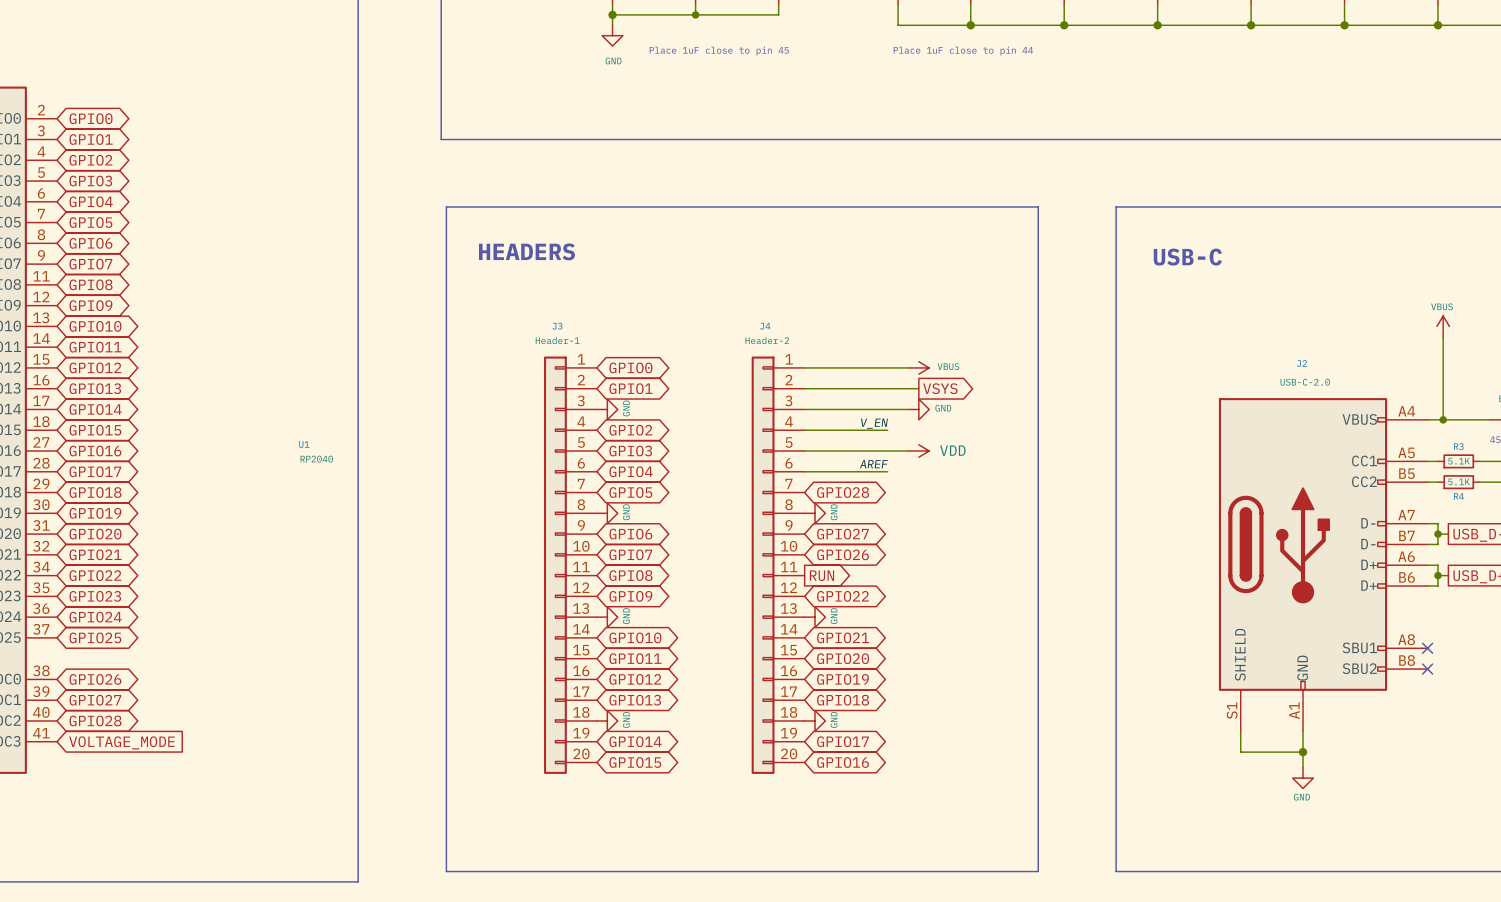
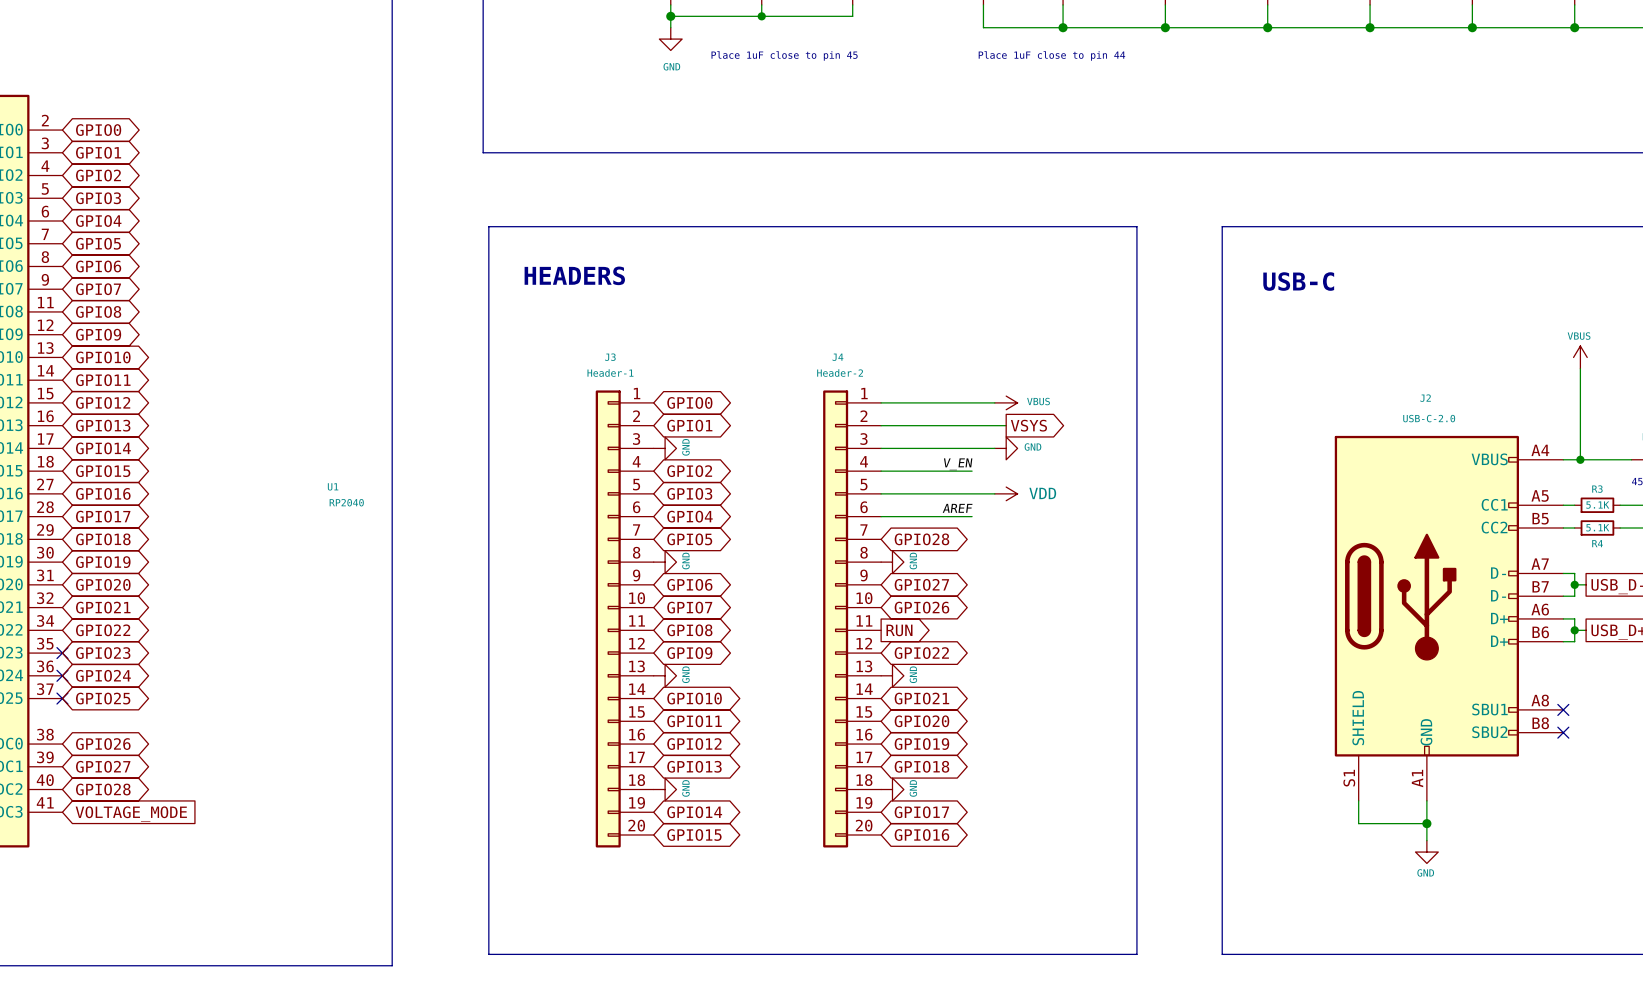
no-connect mark: none -> (62, 653)
no-connect mark: none -> (62, 675)
no-connect mark: none -> (62, 698)

